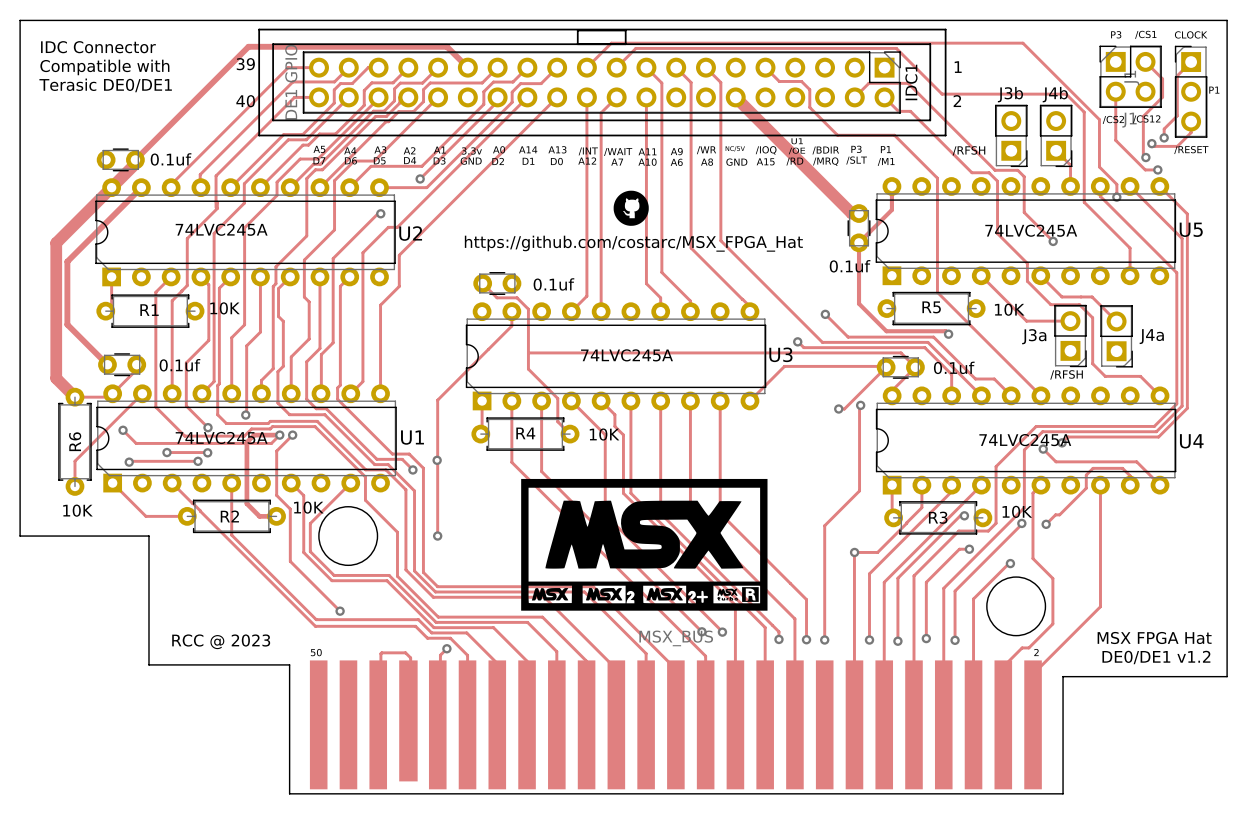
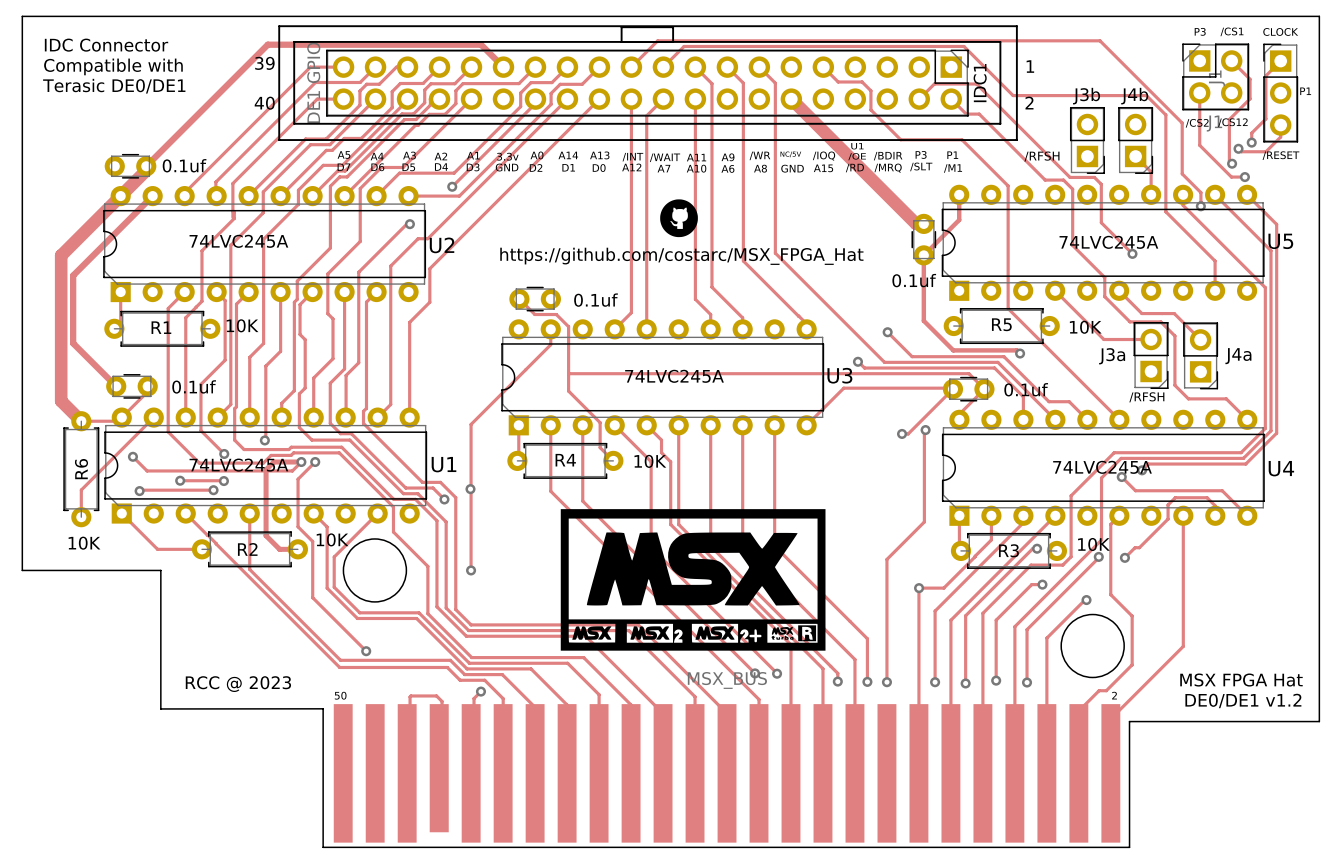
part footprint: [19, 19, 1228, 795] -> [21, 15, 1321, 849]

